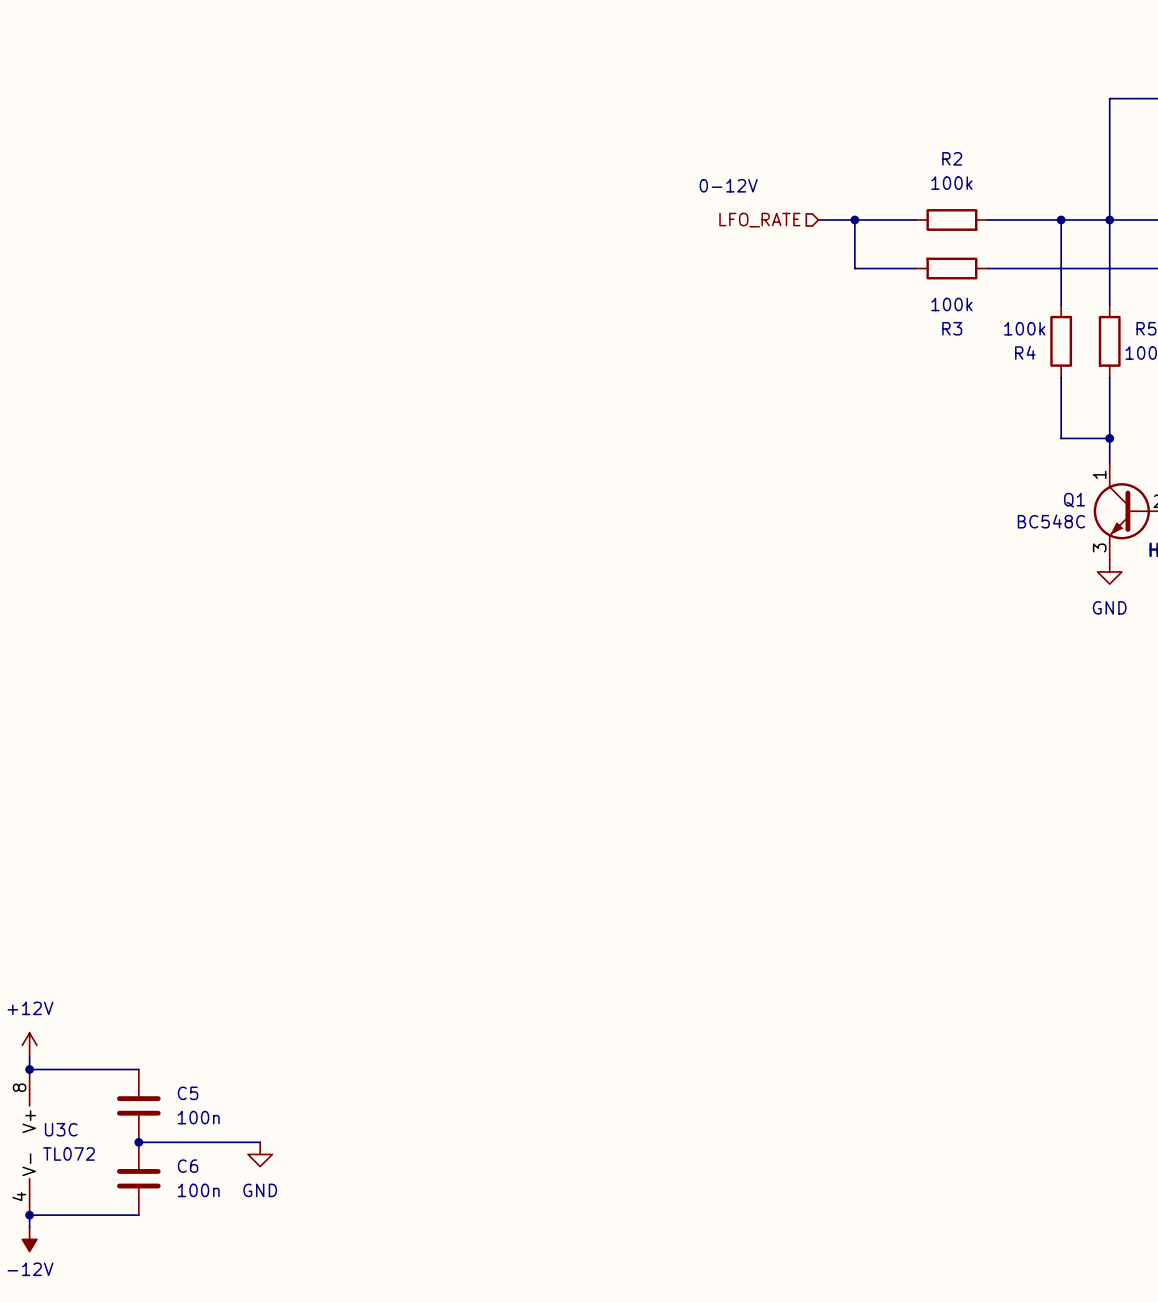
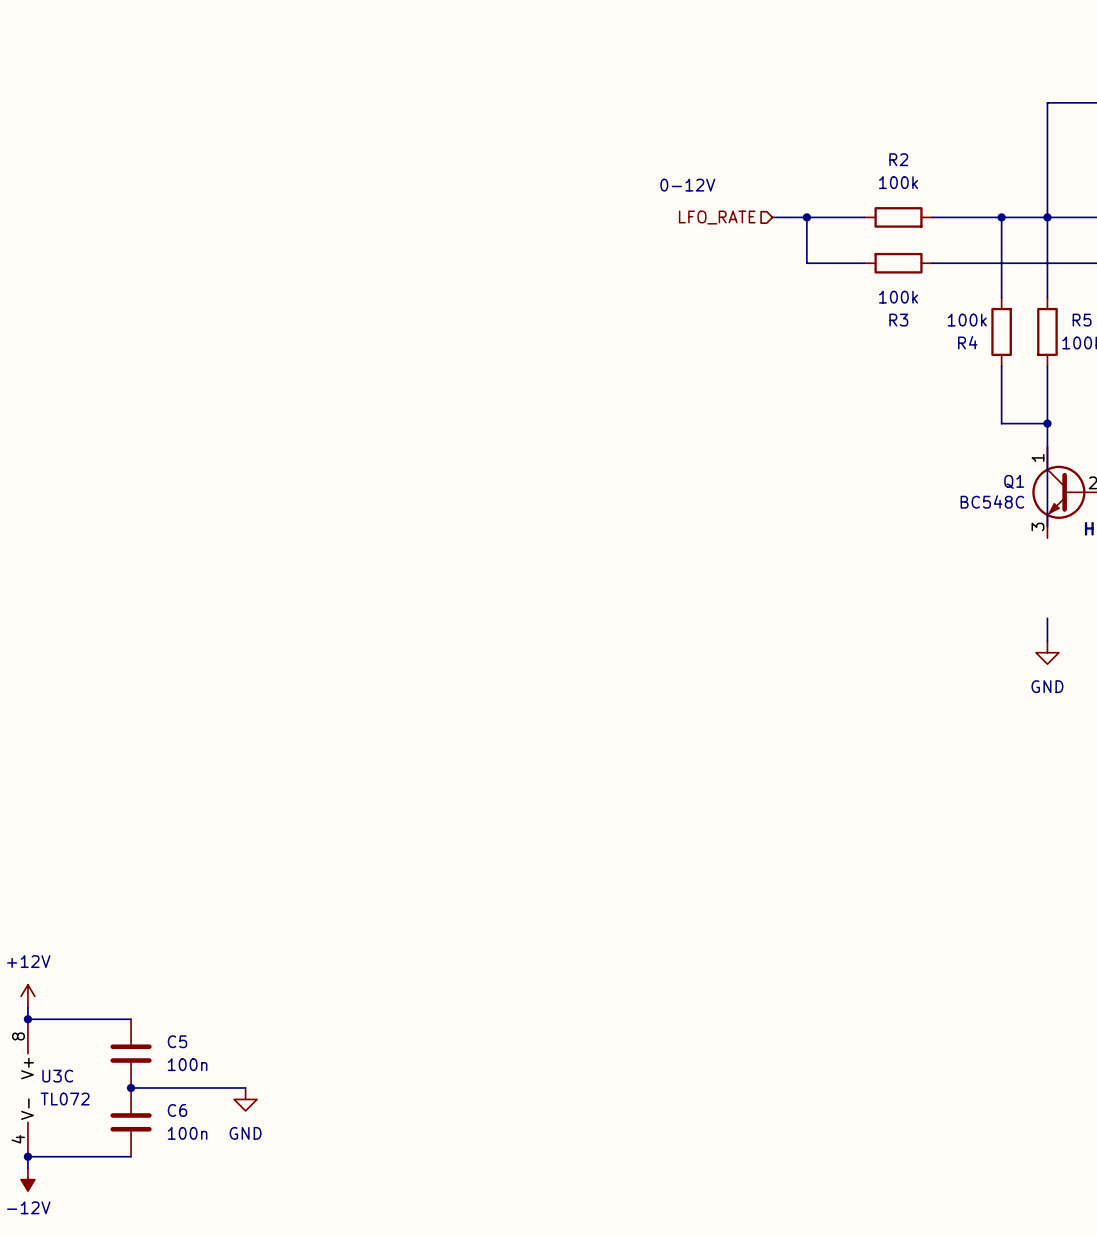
wire: none -> (1047, 446) (1047, 526)
power symbol: GND (1109, 571) -> none
wire: none -> (1047, 618) (1047, 641)
power symbol: none -> GND (1047, 652)

